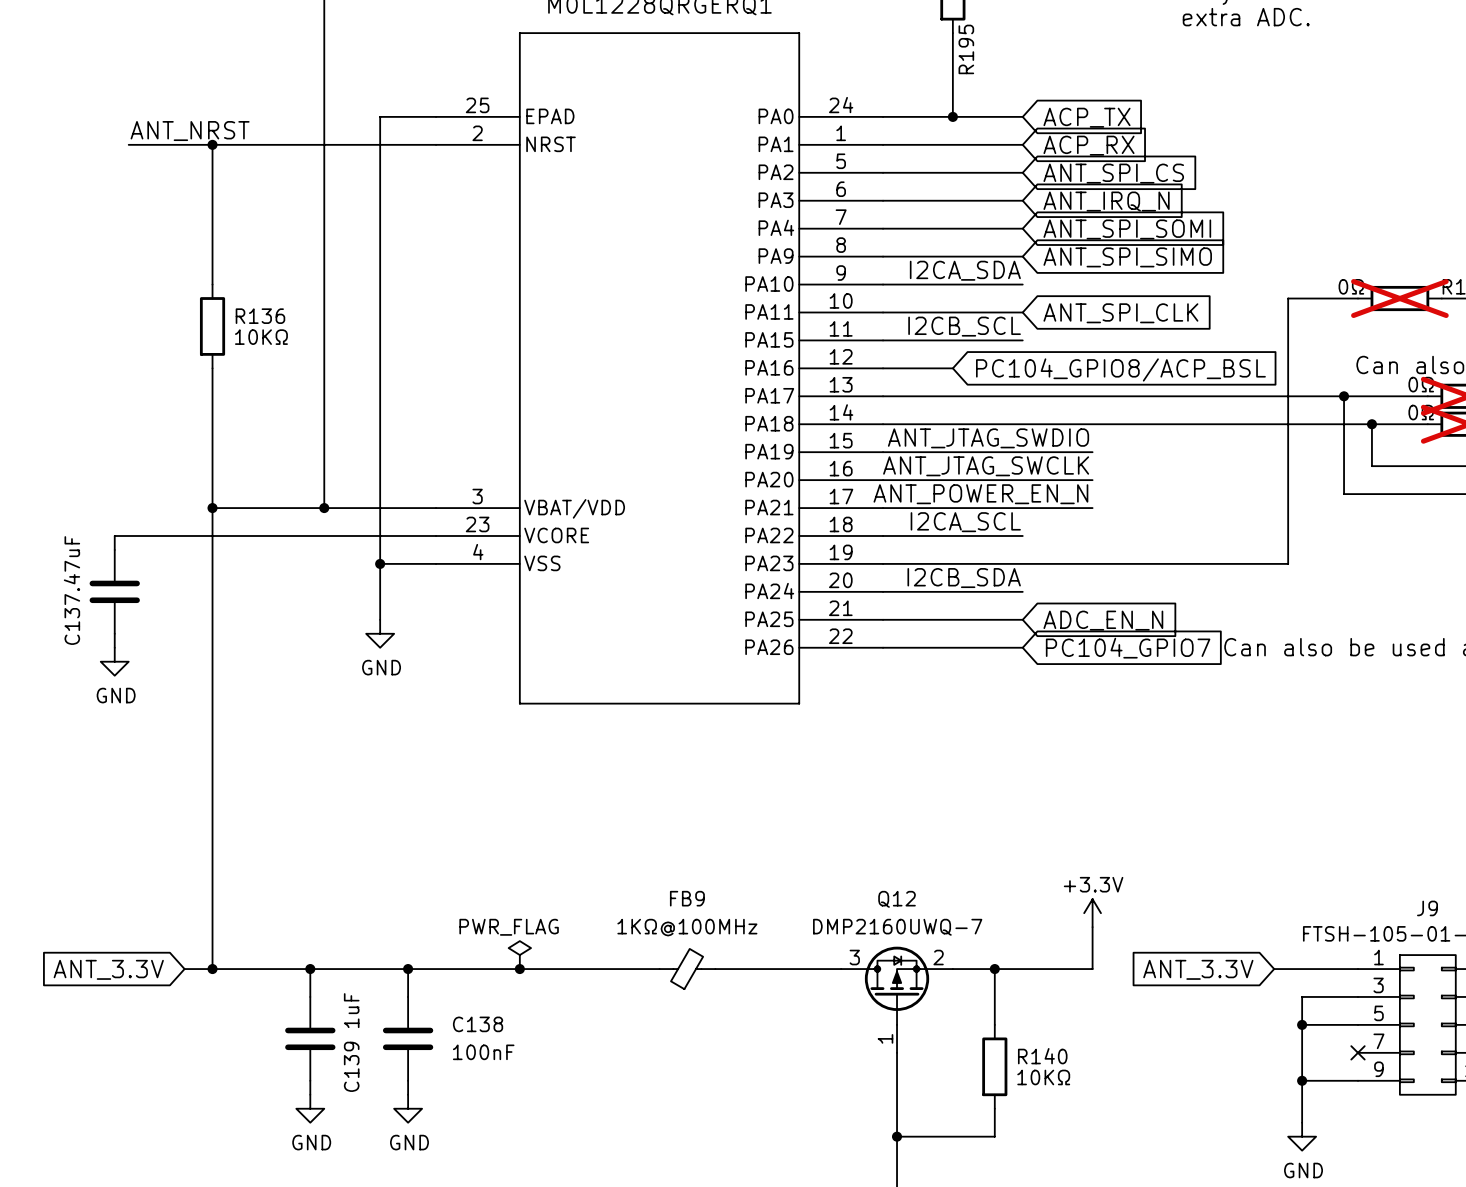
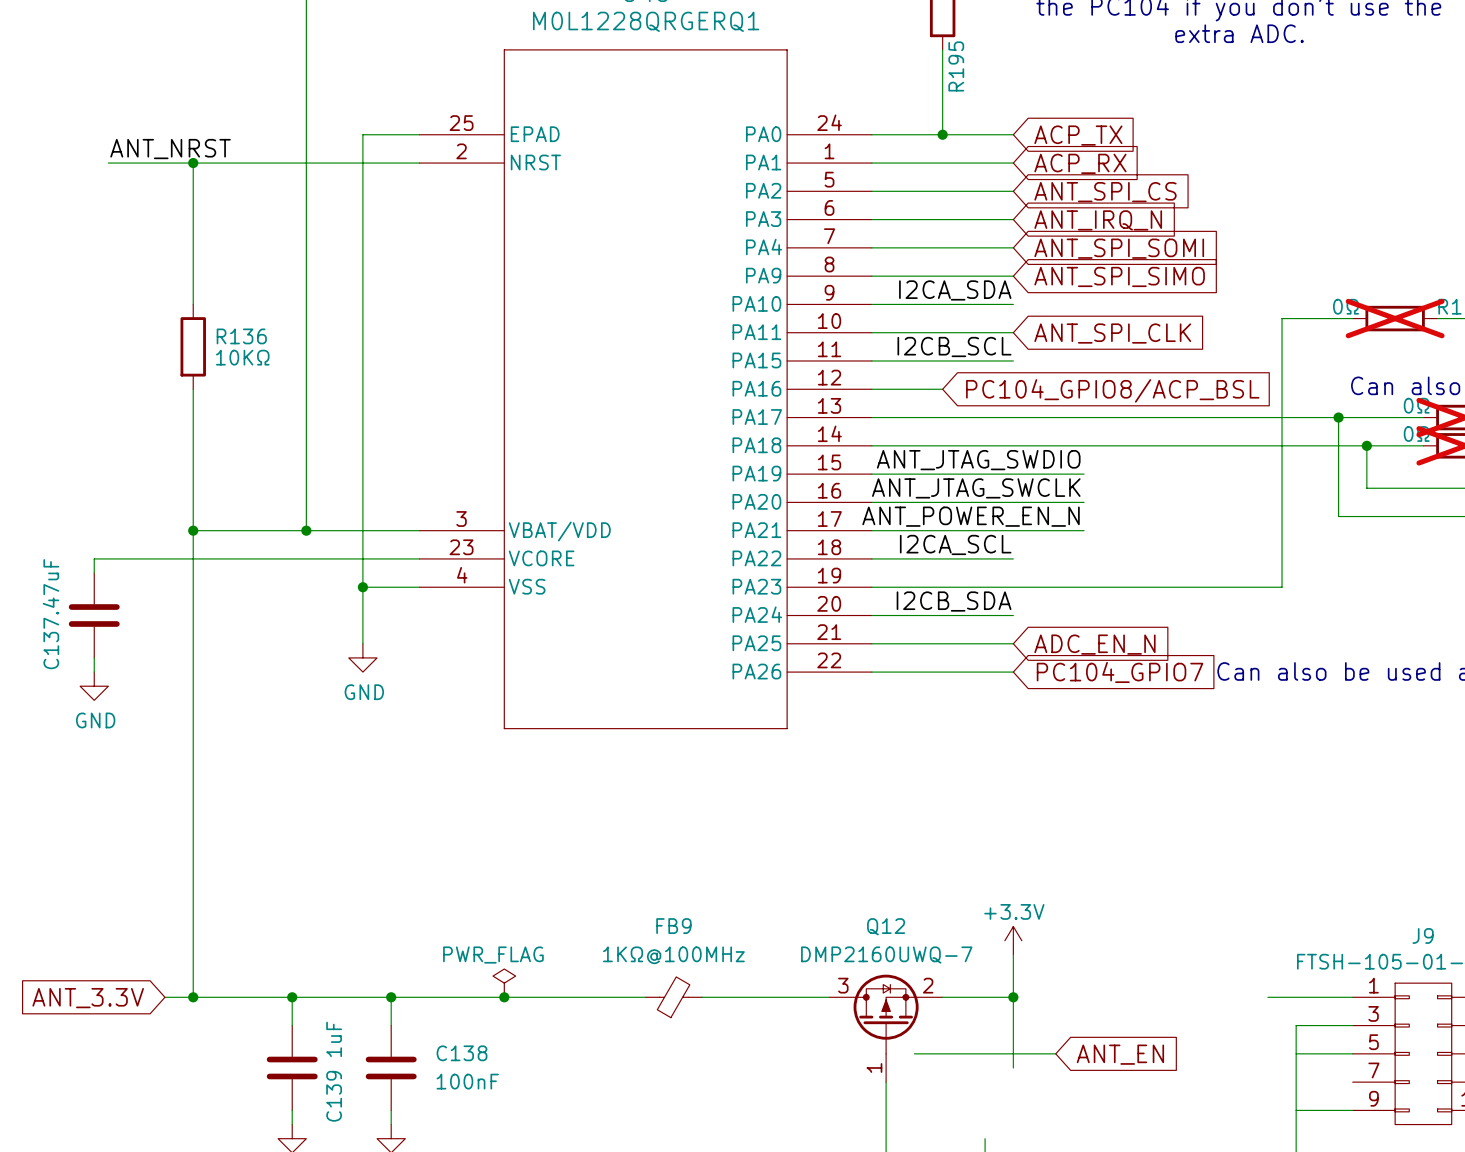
power symbol position: +3.3V (1092, 913) -> +3.3V (1013, 940)
wire: none -> (1013, 954) (1013, 1067)
wire: (1092, 927) (1092, 969) (1022, 969) -> none
wire: (994, 969) (994, 1024) -> none
junction position: (994, 969) -> (1013, 997)
global label: ANT_3.3V (1198, 969) -> none
wire: none -> (914, 1053) (1055, 1053)
junction: (1302, 1024) -> none
global label: none -> ANT_EN (1120, 1054)
no-connect mark: (1358, 1052) -> none
R140: 10KΩ (994, 1066) -> none
junction: (1302, 1080) -> none

